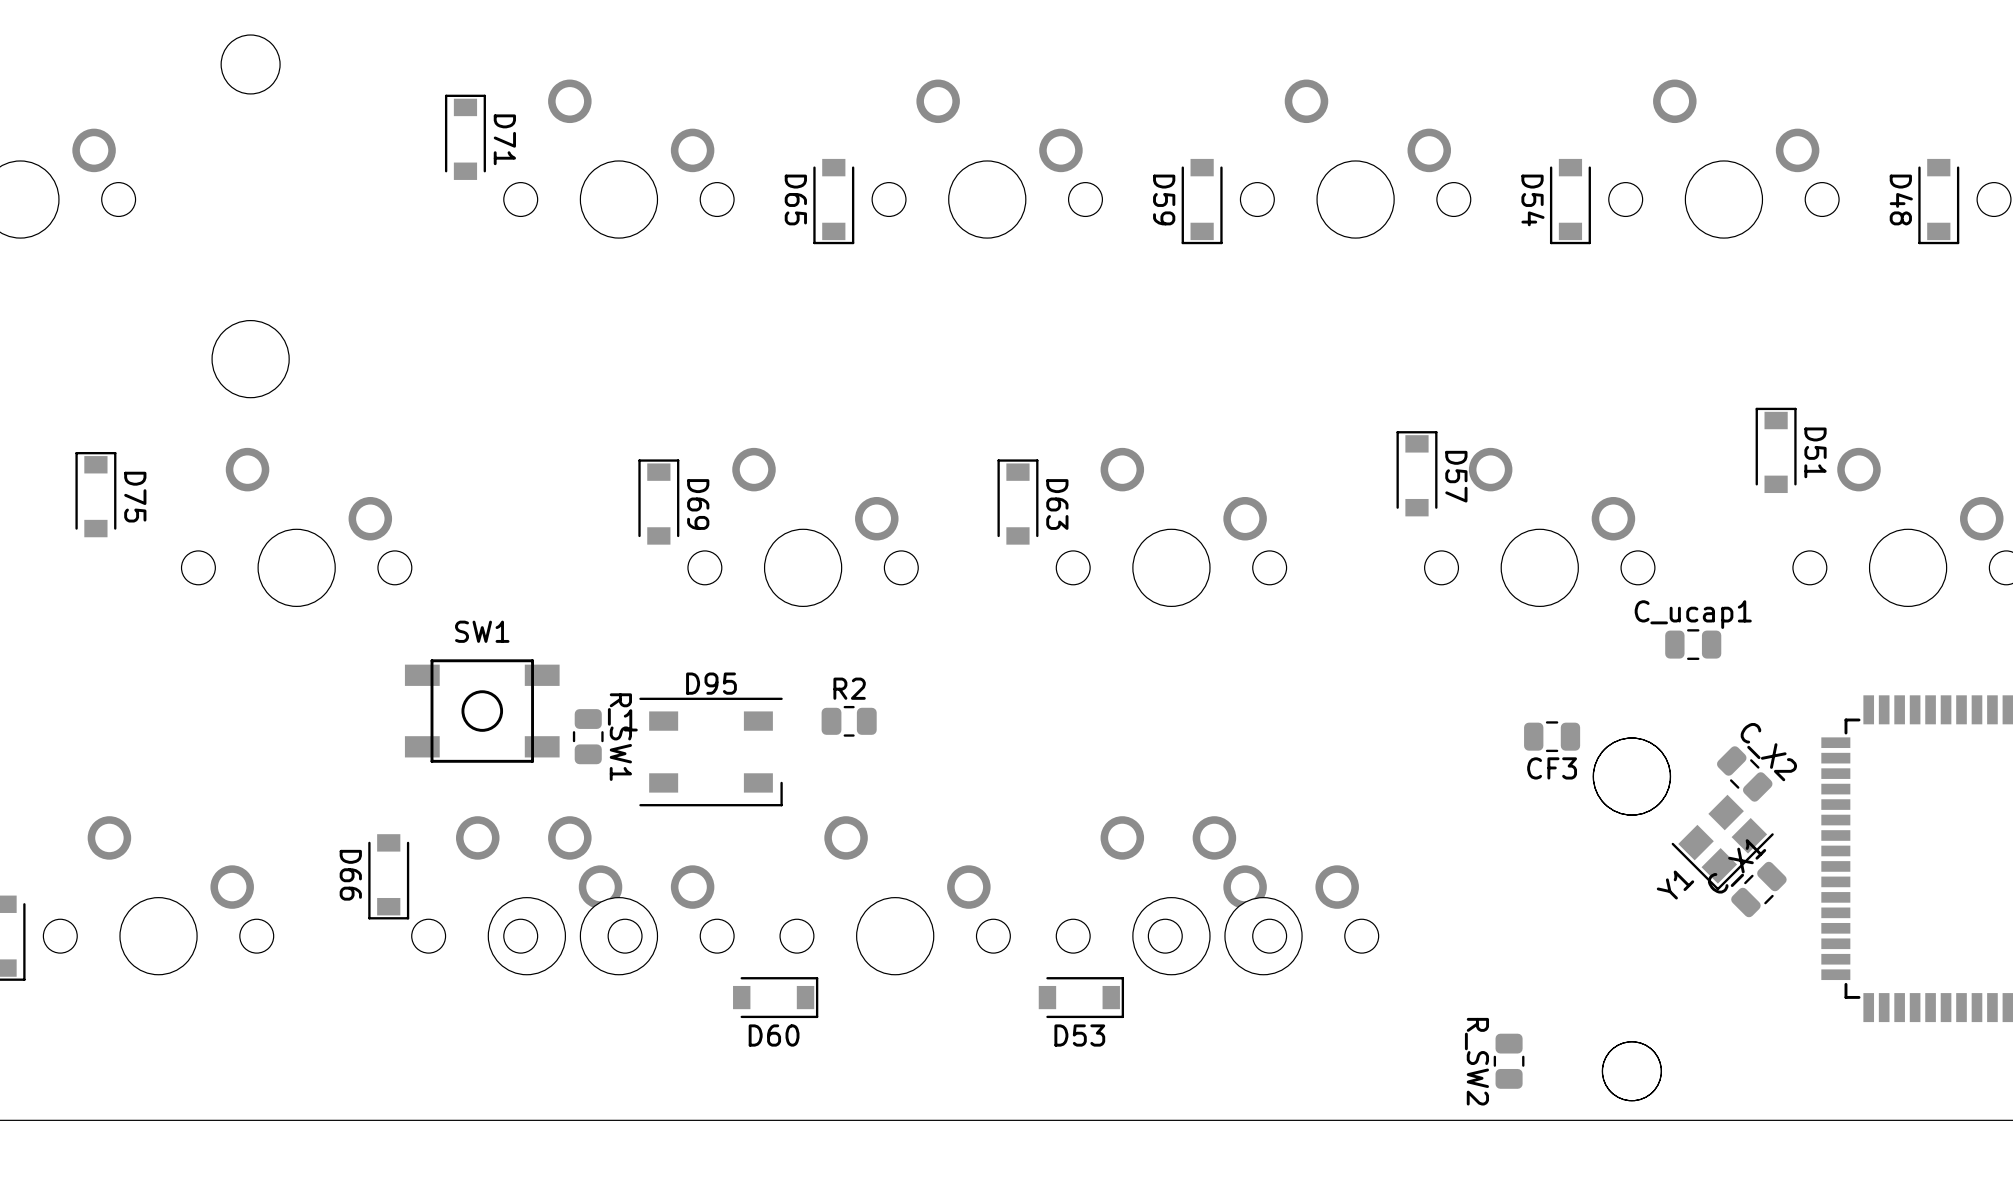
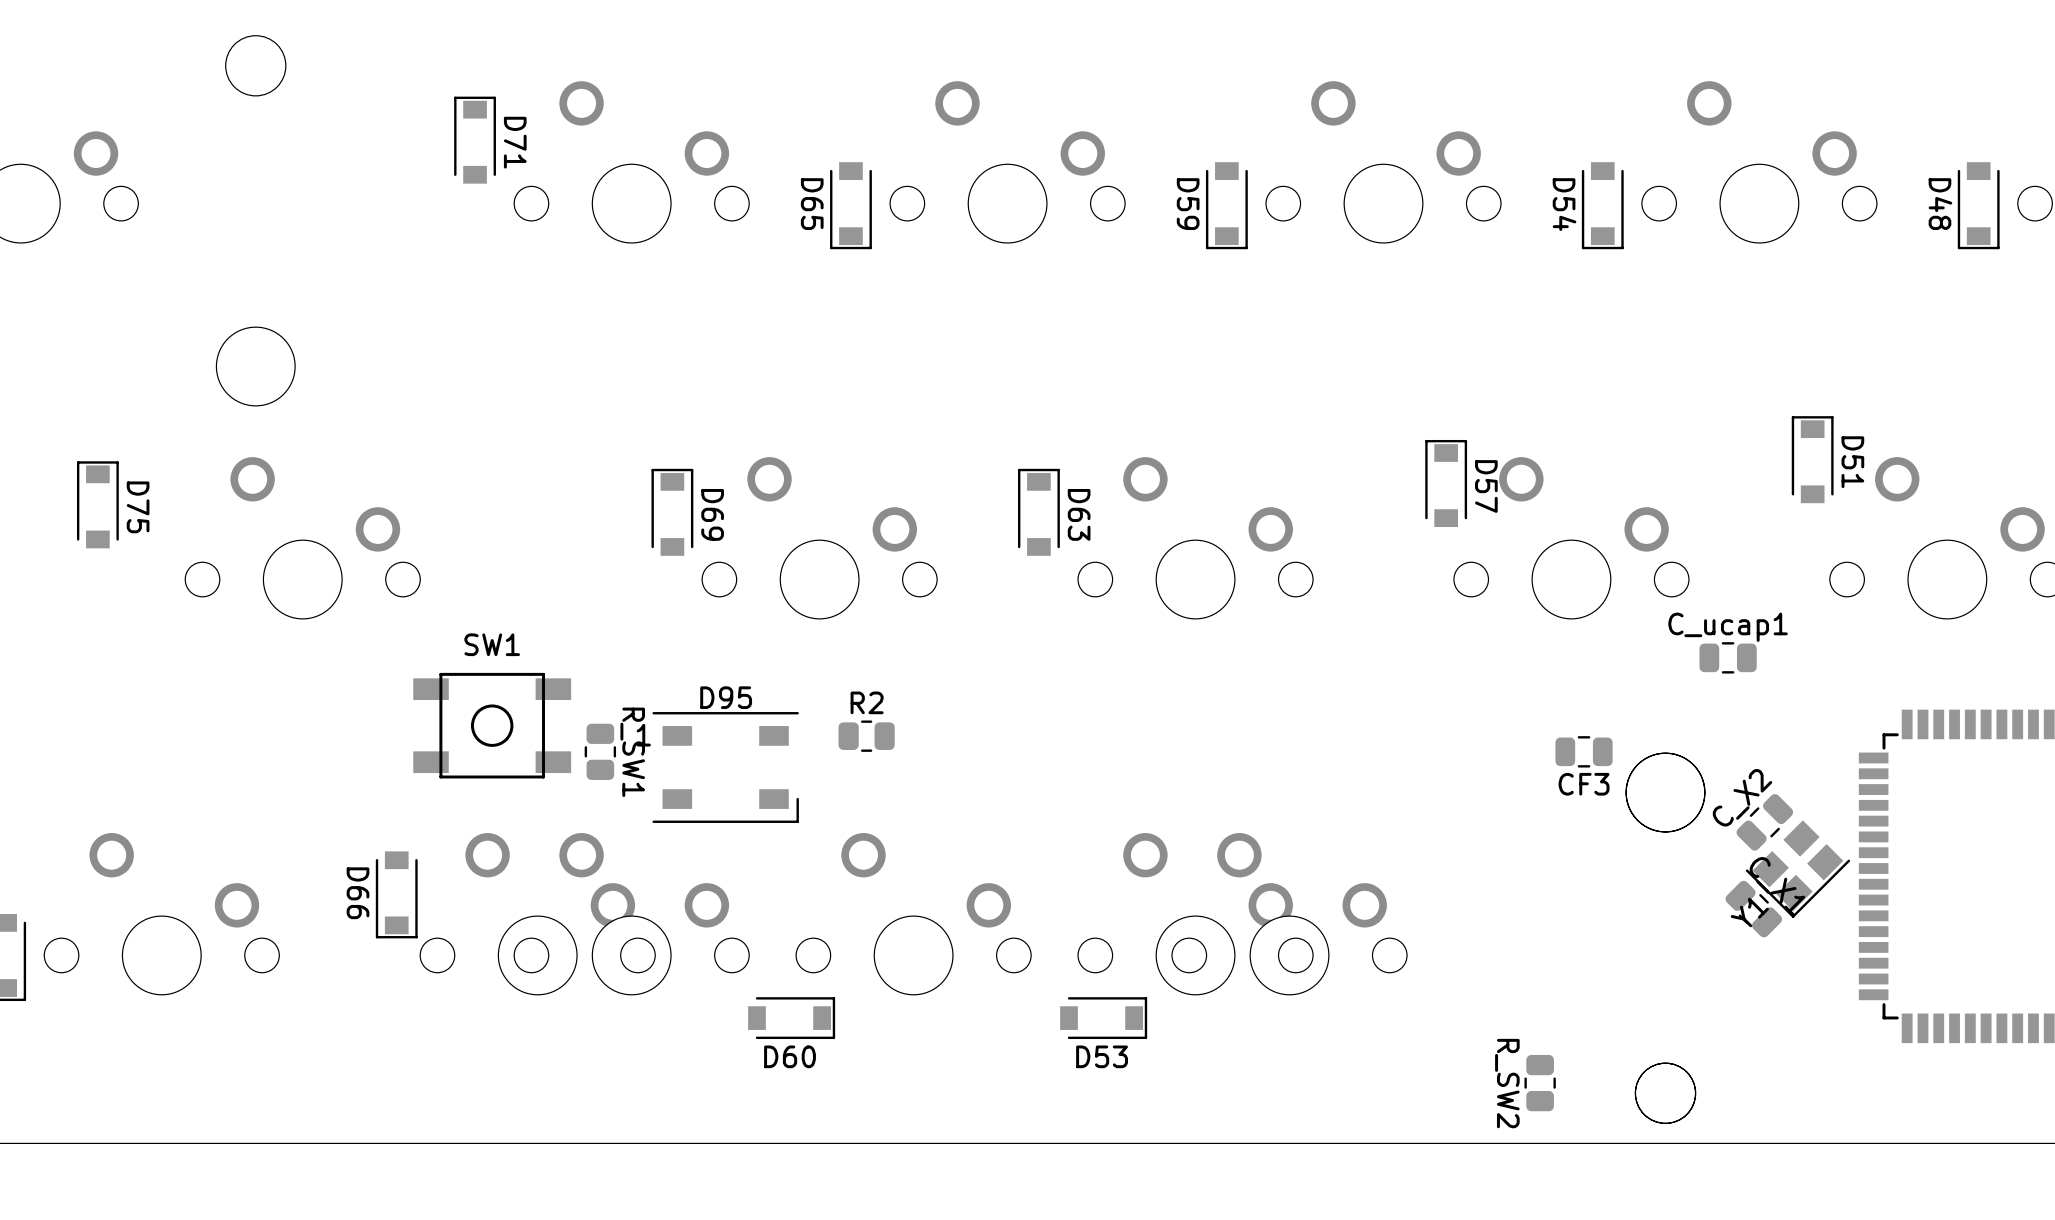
C_X2 name position: C_X2 (1768, 752) -> C_X2 (1742, 797)
C_X2 rotation: 0° (1744, 773) -> 90° clockwise (1764, 822)
C_X2 position: (1744, 773) -> (1764, 822)
Y1 position: (1722, 842) -> (1797, 869)
C_X1 rotation: 0° (1758, 889) -> 90° clockwise (1753, 909)
C_X1 position: (1758, 889) -> (1753, 909)

